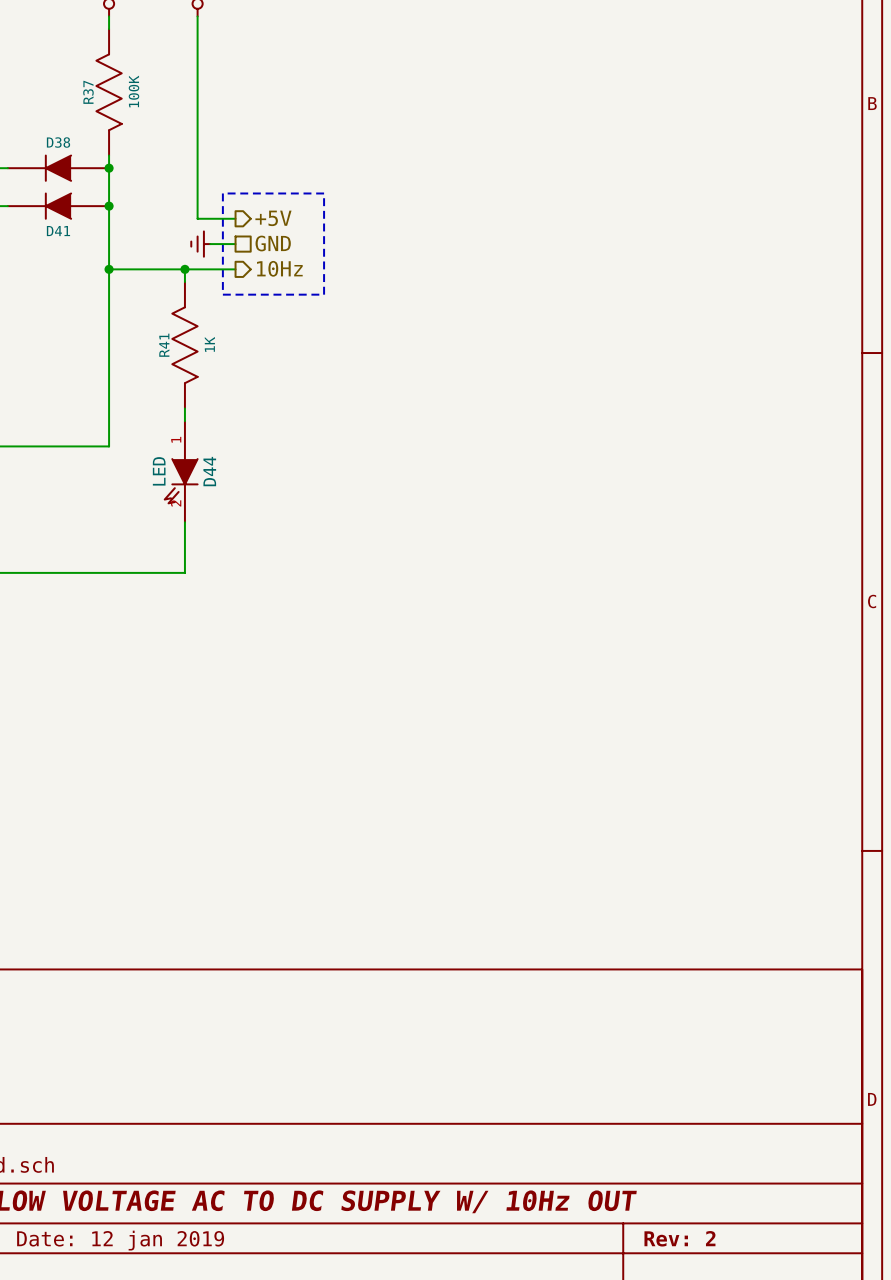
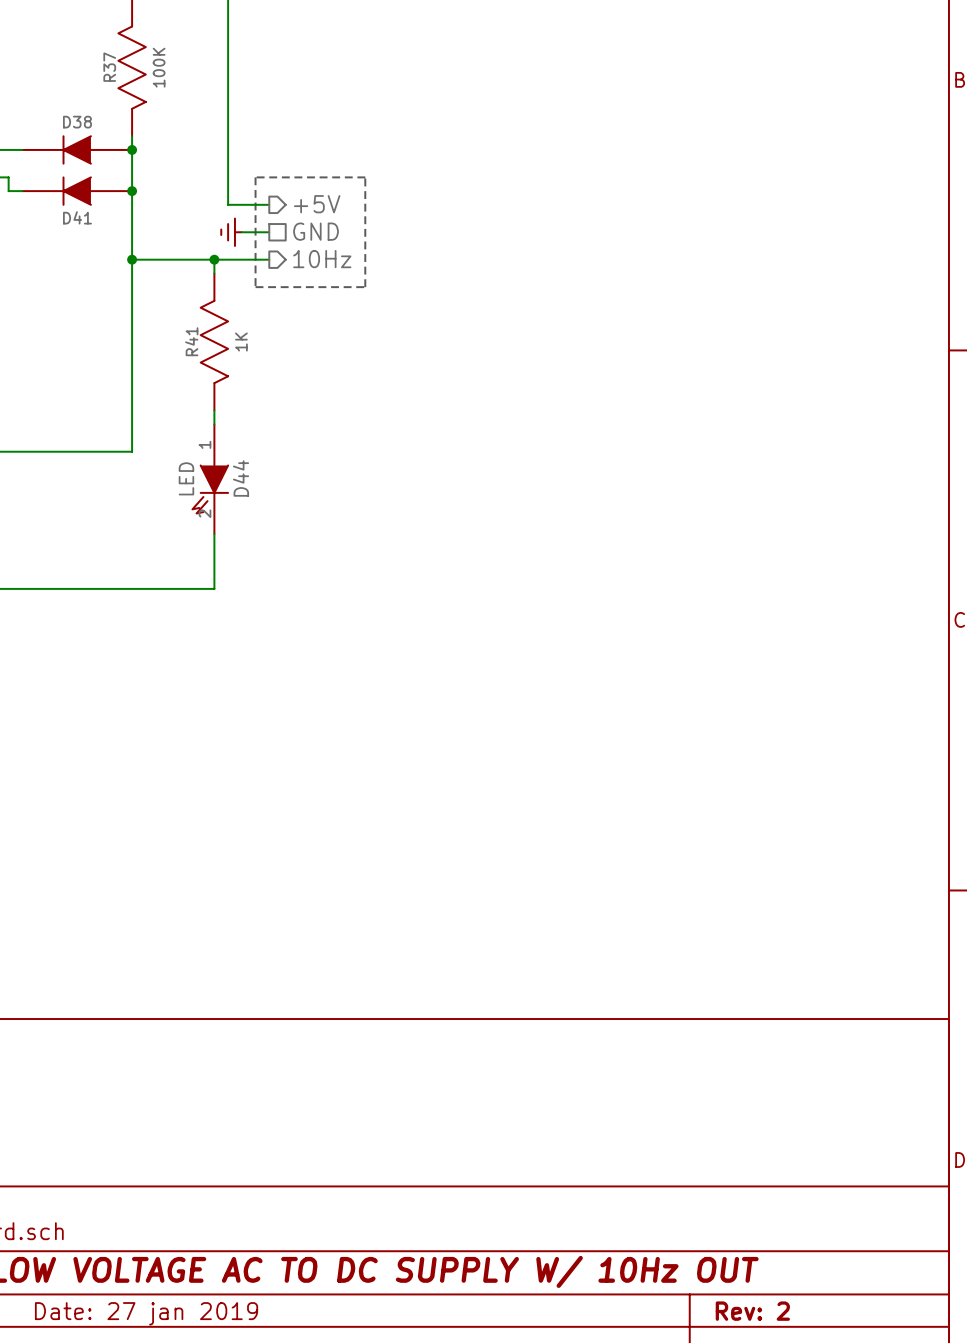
title block: Date: 12 jan 2019 (120, 1240) -> Date: 27 jan 2019 (146, 1313)

